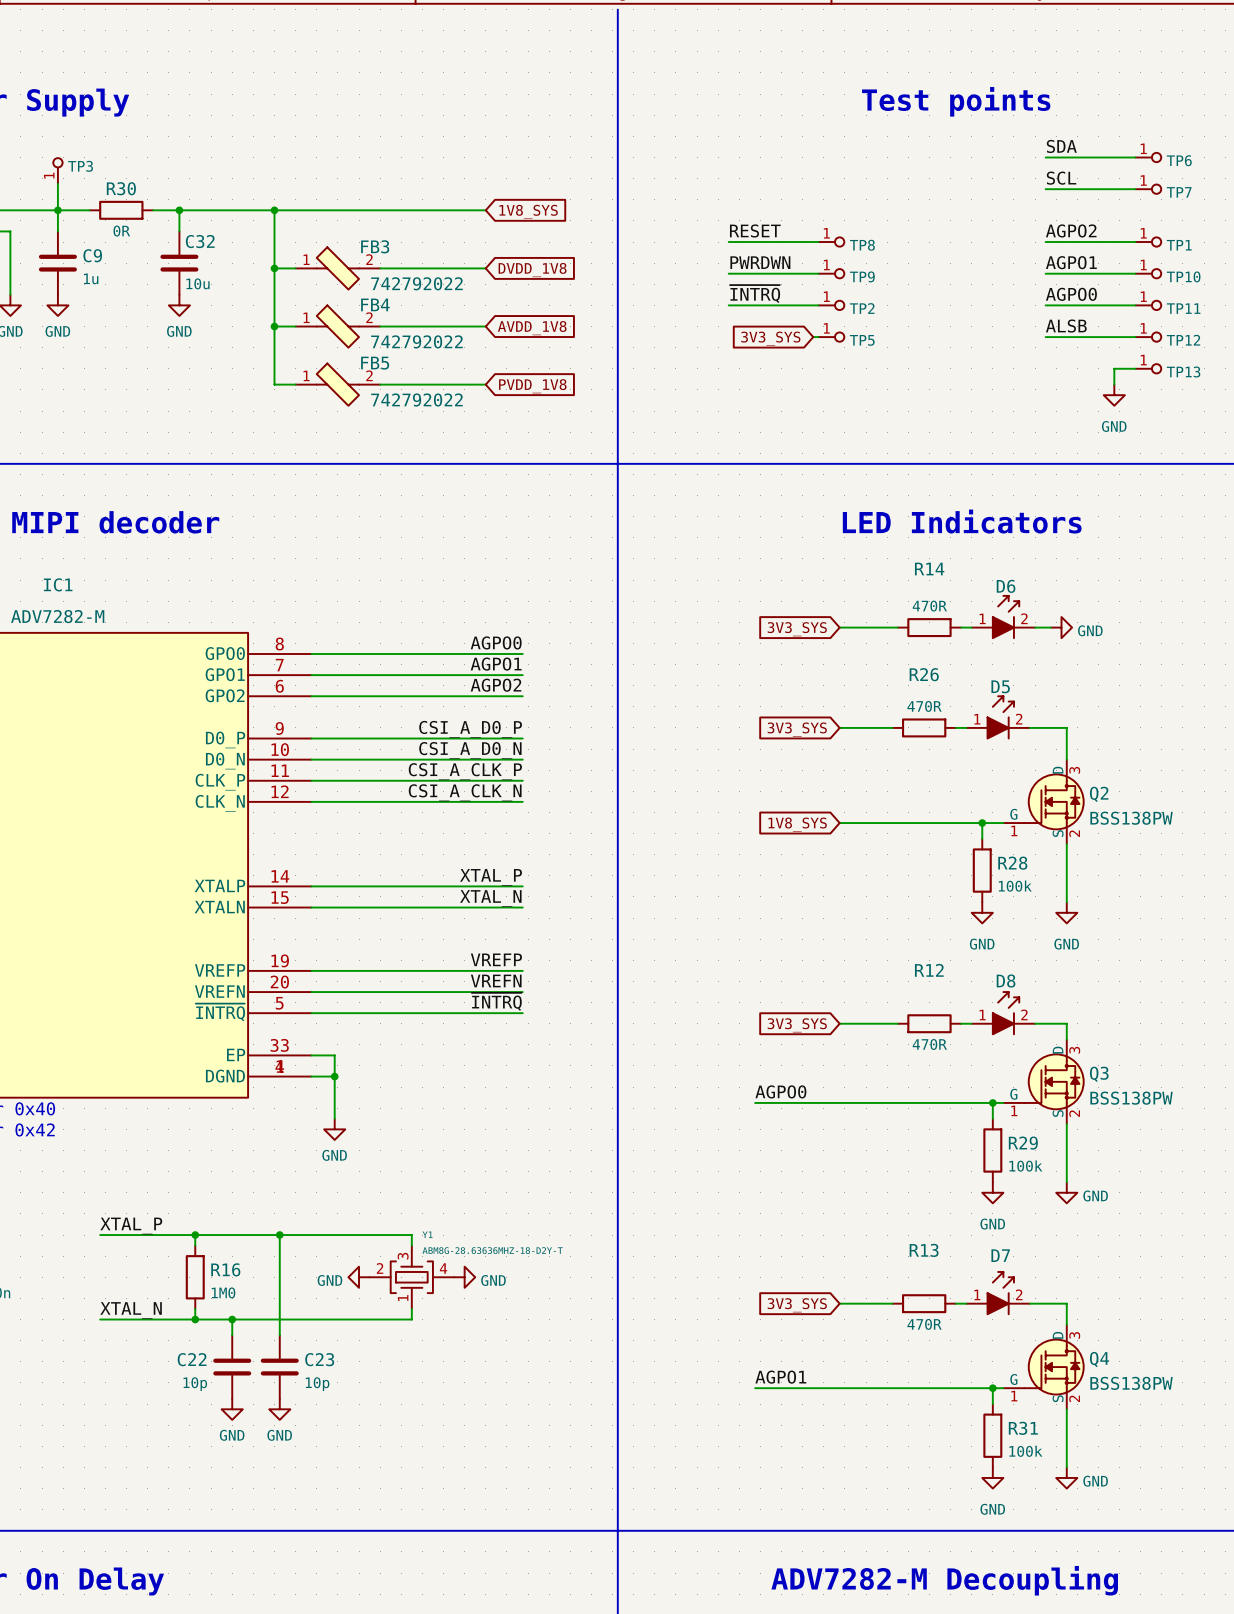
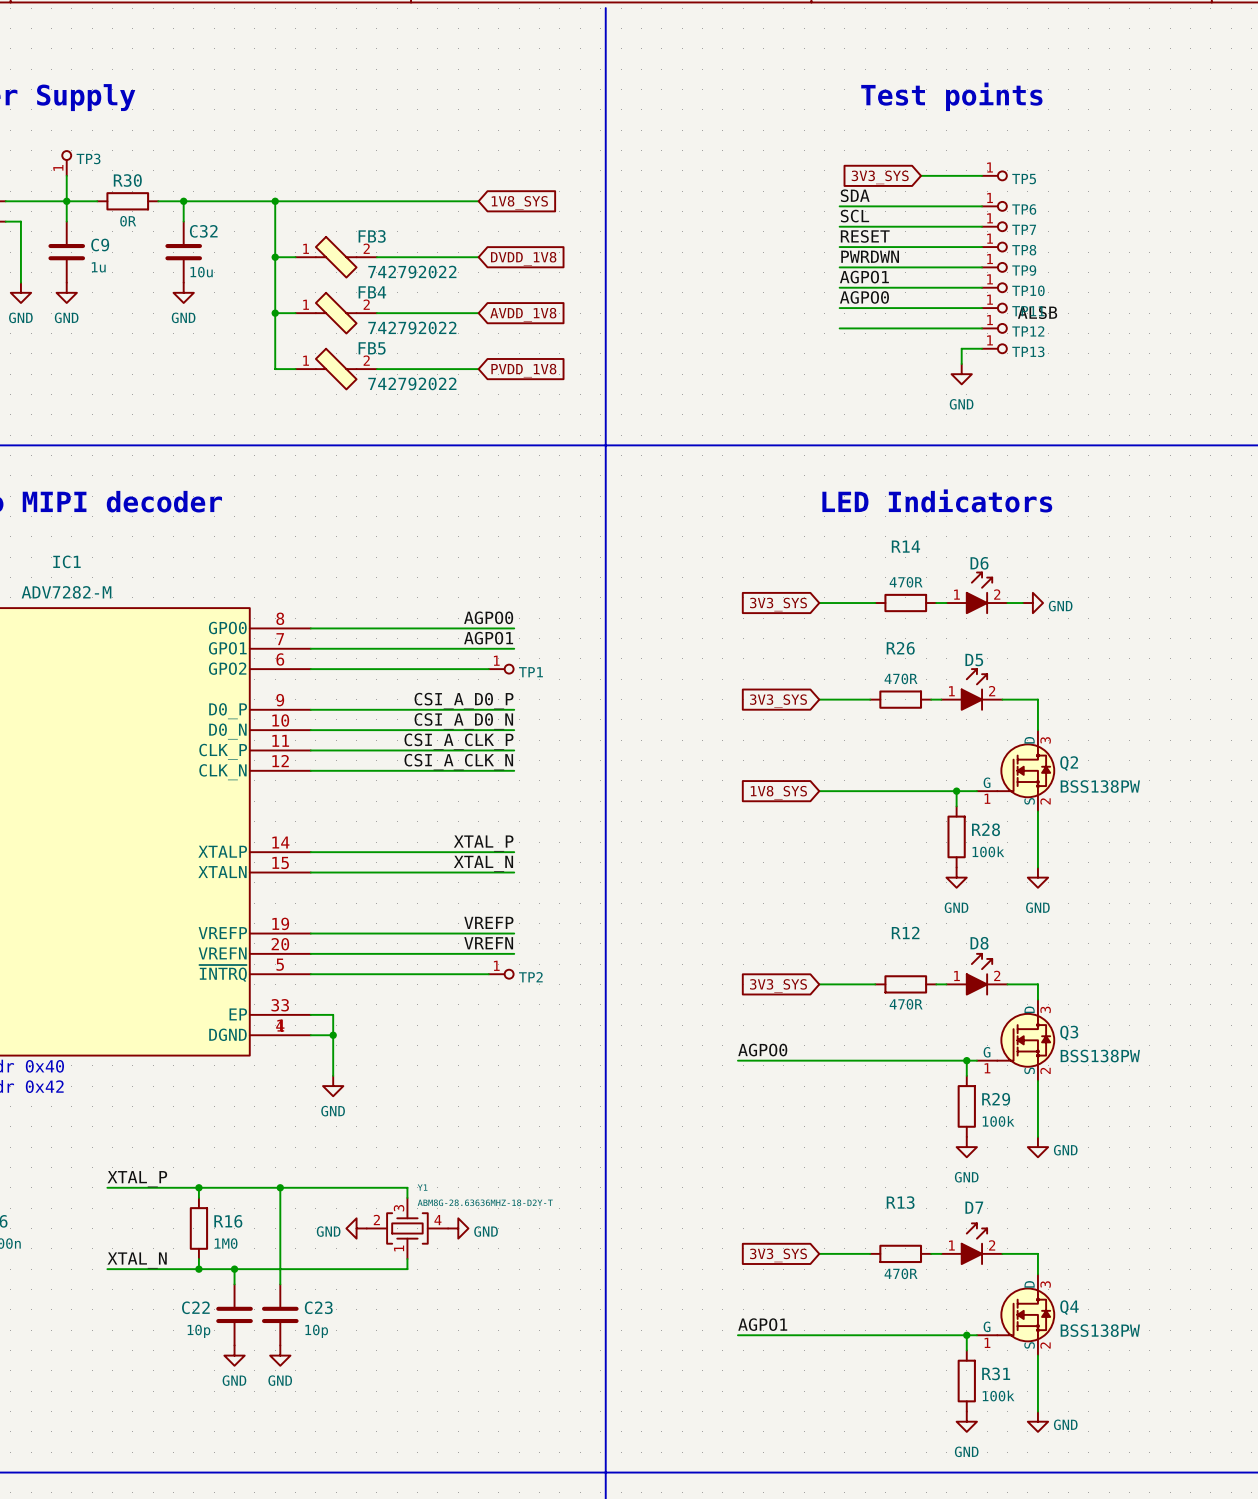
text position: Test points (956, 101) -> Test points (951, 96)
label position: SDA (1061, 146) -> SDA (855, 195)
wire: (1045, 157) (1135, 157) -> none
TP6 position: (1148, 157) -> (994, 206)
label position: SCL (1061, 178) -> SCL (854, 216)
wire: none -> (921, 175) (982, 175)
wire: (1045, 189) (1135, 189) -> none
TP7 position: (1148, 189) -> (994, 226)
wire: none -> (839, 206) (982, 206)
label position: RESET (755, 230) -> RESET (865, 236)
label: AGPO2 (1071, 230) -> none
wire: none -> (839, 226) (982, 226)
wire: (728, 242) (818, 242) -> none
TP8 position: (831, 242) -> (994, 247)
wire: (1045, 242) (1135, 242) -> none
TP1 position: (1148, 242) -> (501, 669)
wire: none -> (839, 247) (982, 247)
label position: PWRDWN (760, 262) -> PWRDWN (870, 256)
label position: AGPO1 (1071, 262) -> AGPO1 (864, 277)
wire: (728, 273) (818, 273) -> none
TP9 position: (831, 273) -> (994, 267)
wire: (1045, 273) (1135, 273) -> none
TP10 position: (1148, 273) -> (994, 287)
wire: none -> (839, 267) (982, 267)
label: ~{INTRQ} (755, 294) -> none
label position: AGPO0 (1071, 294) -> AGPO0 (864, 297)
wire: none -> (839, 287) (982, 287)
wire: (728, 305) (818, 305) -> none
TP2 position: (831, 305) -> (501, 974)
wire: (1045, 305) (1135, 305) -> none
TP11 position: (1148, 305) -> (994, 308)
wire: none -> (839, 308) (982, 308)
wire: (813, 337) (818, 337) -> none
TP5 position: (831, 337) -> (994, 175)
wire: (1045, 337) (1135, 337) -> none
TP12 position: (1148, 337) -> (994, 328)
global label position: 3V3_SYS (770, 338) -> 3V3_SYS (880, 177)
wire: none -> (839, 328) (982, 328)
wire: (1135, 368) (1114, 368) (1114, 384) -> (982, 348) (961, 348) (961, 364)
TP13 position: (1148, 368) -> (994, 348)
power symbol position: GND (1114, 395) -> GND (961, 374)
label: AGPO2 (495, 685) -> none
label: ~{INTRQ} (496, 1001) -> none

